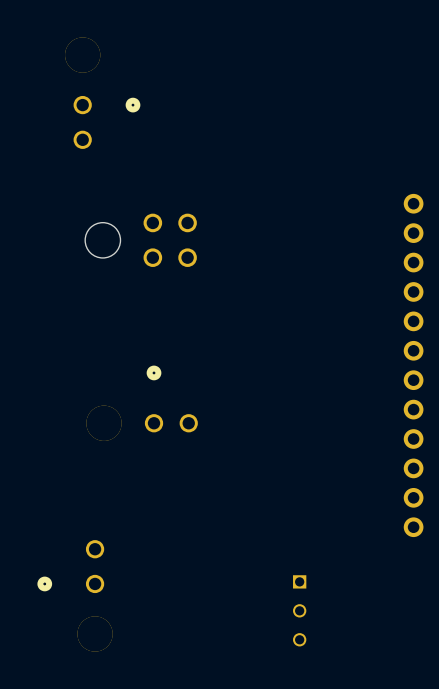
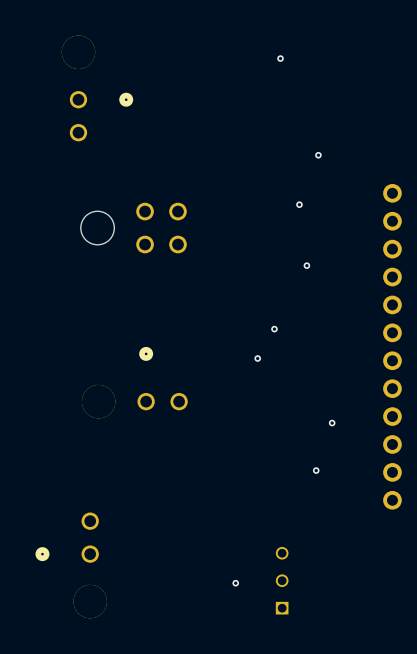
via: none -> (280, 58)
via: none -> (318, 155)
via: none -> (299, 204)
via: none -> (306, 265)
via: none -> (274, 329)
via: none -> (257, 358)
via: none -> (332, 423)
via: none -> (316, 470)
part rotation: 0° (299, 610) -> 180° (282, 580)
via: none -> (235, 583)

